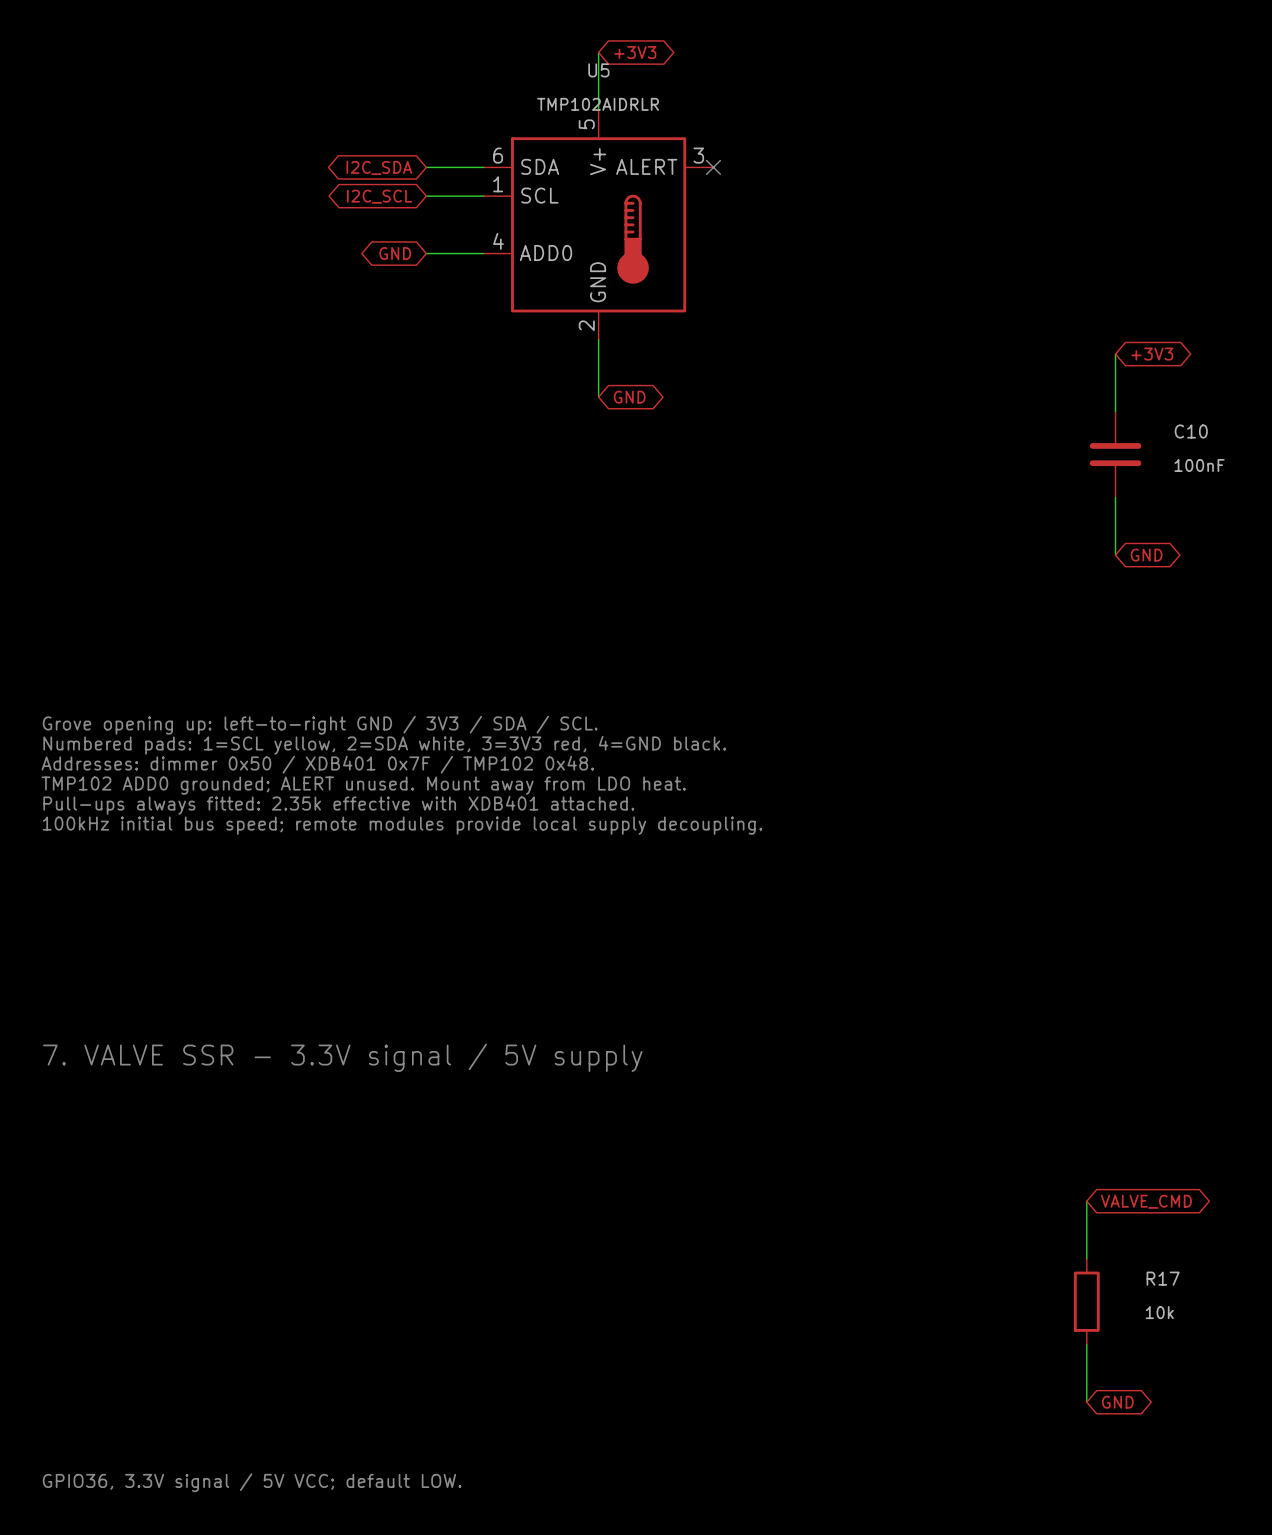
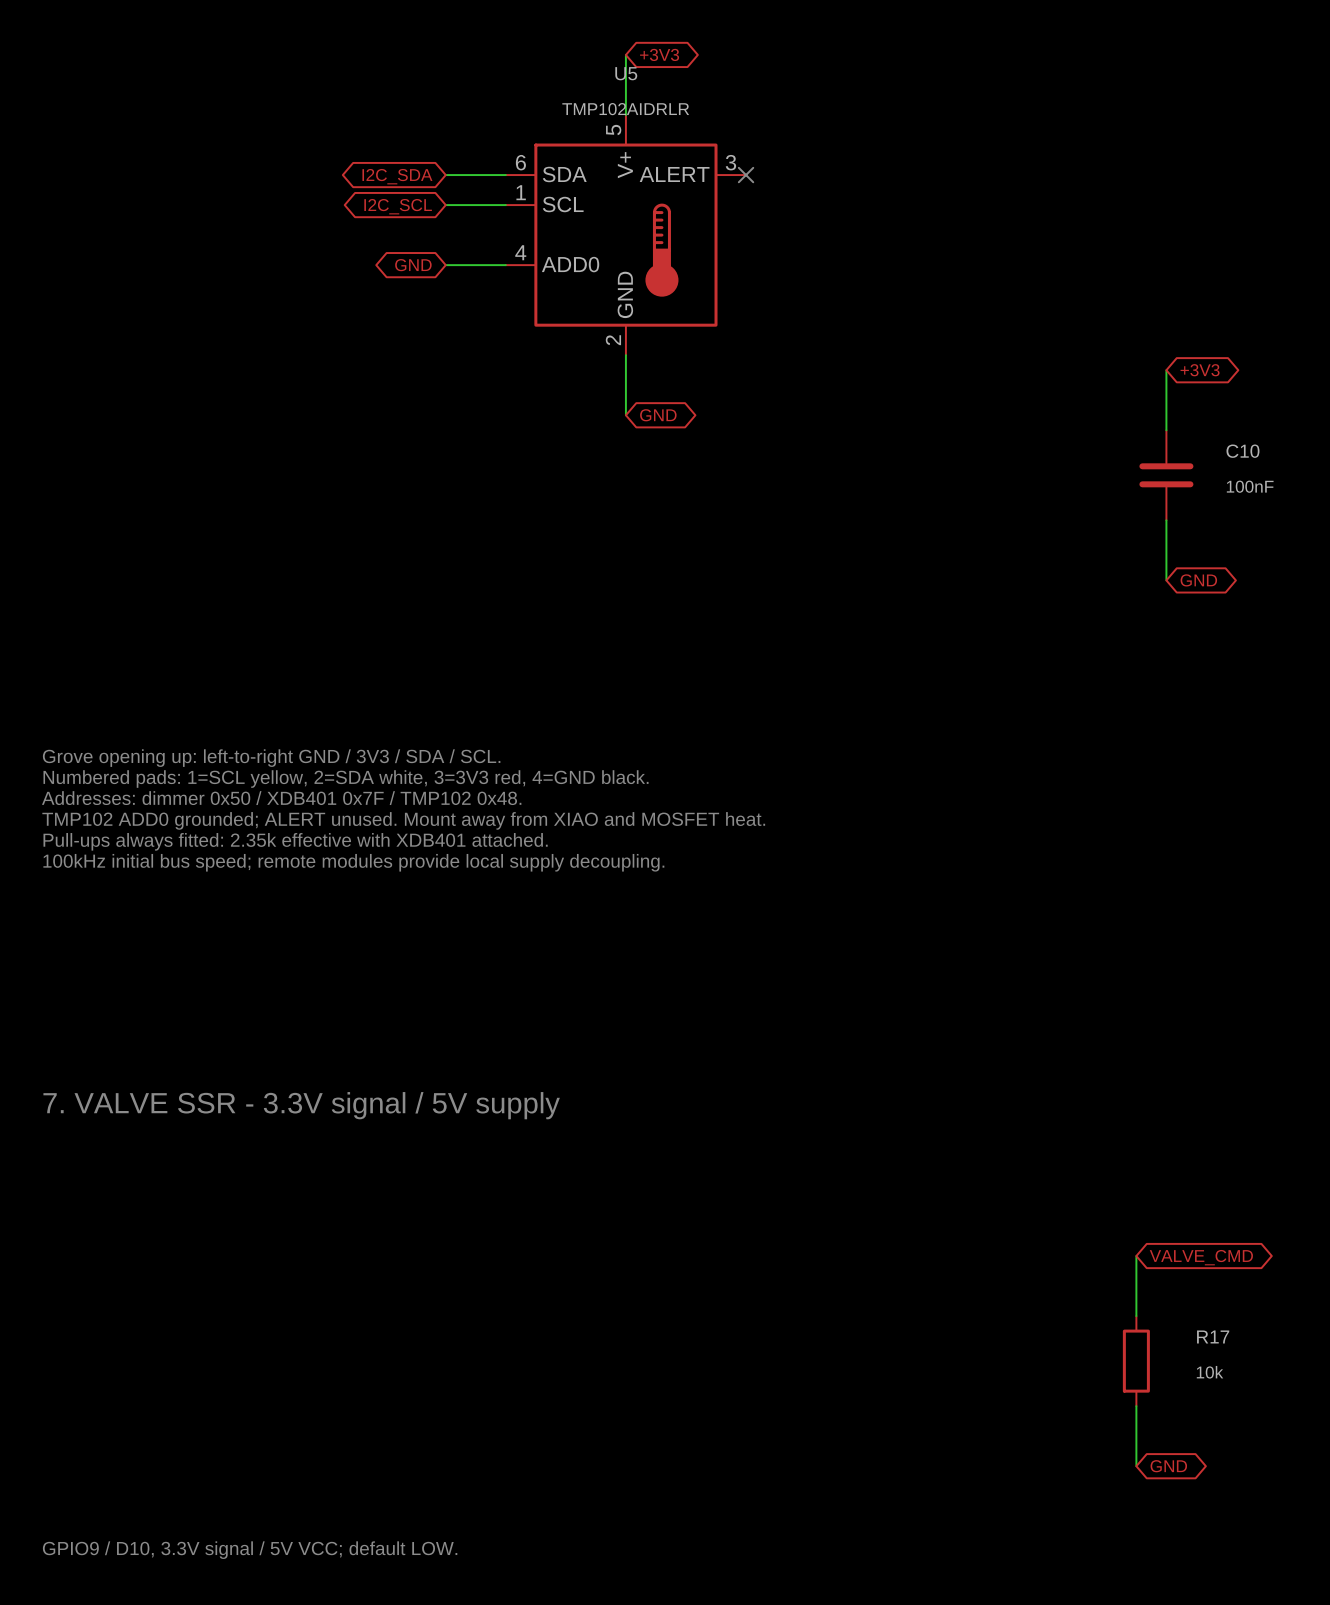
text: TMP102 ADD0 grounded; ALERT unused. Mount away from LDO heat. (363, 785) -> TMP102 ADD0 grounded; ALERT unused. Mount away from XIAO and MOSFET heat. (403, 820)
text: GPIO36, 3.3V signal / 5V VCC; default LOW. (252, 1482) -> GPIO9 / D10, 3.3V signal / 5V VCC; default LOW. (250, 1550)

